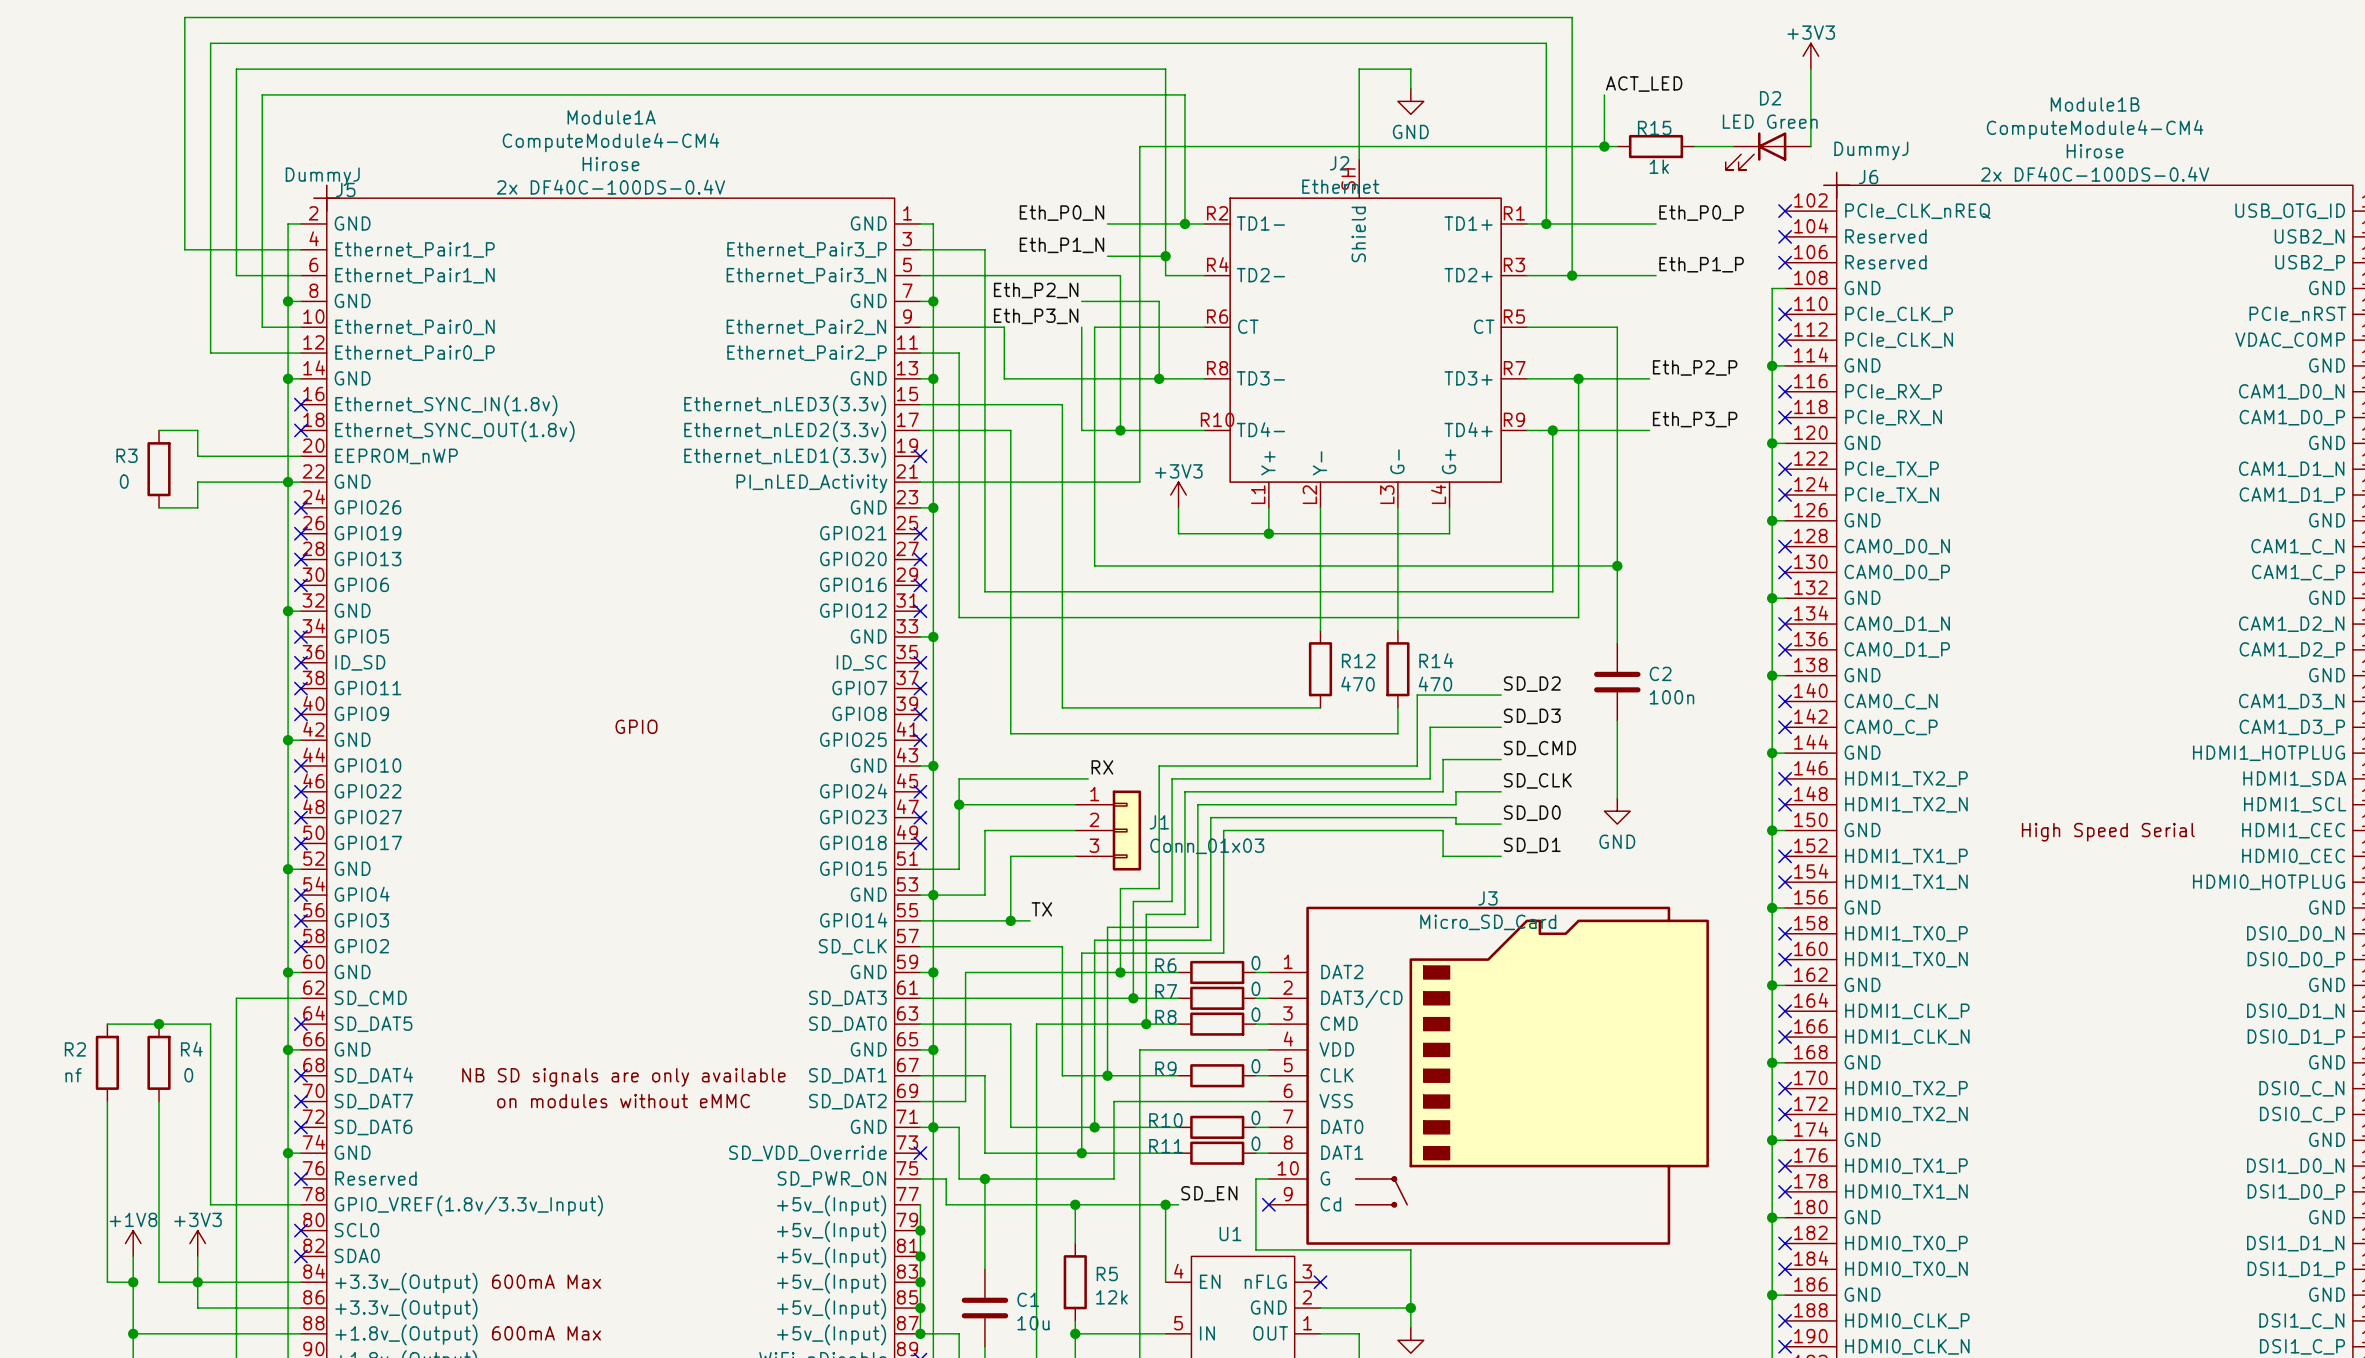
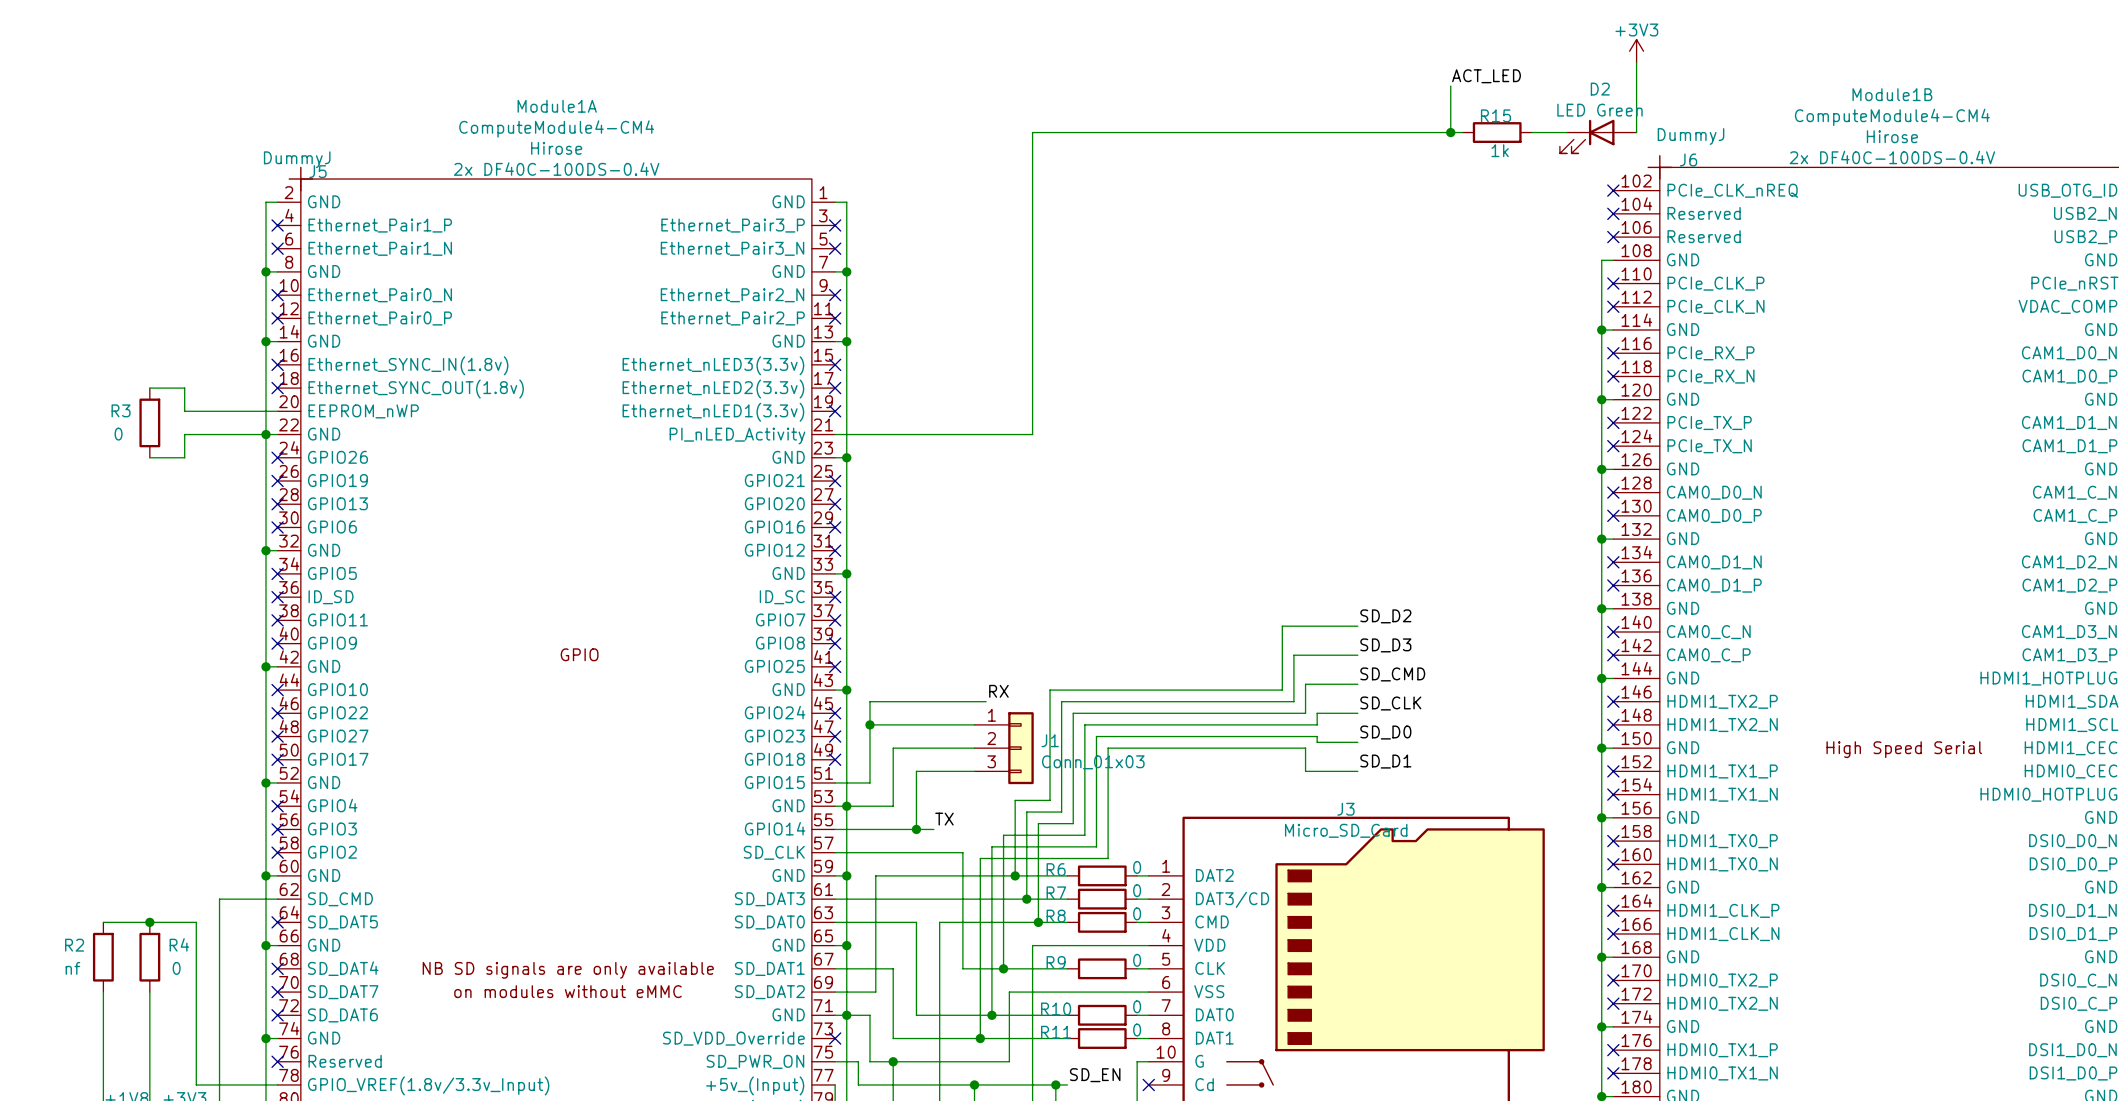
wire: (1410, 88) (1410, 69) (1359, 69) (1359, 159) -> none
power symbol: GND (1410, 101) -> none
label: Eth_P0_N (1061, 213) -> none
label: Eth_P0_P (1701, 213) -> none
wire: (1107, 223) (1204, 223) -> none
wire: (1184, 223) (1184, 94) (262, 94) (262, 327) (300, 327) -> none
junction: (1184, 223) -> none
wire: (1526, 223) (1656, 223) -> none
wire: (1546, 223) (1546, 43) (210, 43) (210, 353) (300, 353) -> none
junction: (1546, 223) -> none
label: Eth_P1_N (1061, 245) -> none
wire: (300, 249) (184, 249) (184, 17) (1572, 17) (1572, 275) -> none
no-connect mark: none -> (277, 225)
wire: (920, 249) (984, 249) (984, 591) (1552, 591) (1552, 430) -> none
no-connect mark: none -> (835, 225)
wire: (1107, 256) (1165, 256) -> none
junction: (1165, 256) -> none
label: Eth_P1_P (1701, 264) -> none
wire: (300, 275) (236, 275) (236, 69) (1165, 69) (1165, 275) (1204, 275) -> none
no-connect mark: none -> (277, 248)
wire: (920, 275) (1120, 275) (1120, 430) -> none
no-connect mark: none -> (835, 248)
wire: (1526, 275) (1656, 275) -> none
junction: (1572, 275) -> none
label: Eth_P2_N (1036, 290) -> none
wire: (1081, 301) (1159, 301) (1159, 378) -> none
label: Eth_P3_N (1036, 316) -> none
no-connect mark: none -> (277, 295)
wire: (920, 327) (1004, 327) (1004, 378) (1204, 378) -> none
no-connect mark: none -> (835, 295)
wire: (1081, 327) (1081, 430) (1204, 430) -> none
wire: (1204, 327) (1094, 327) (1094, 565) (1617, 565) -> none
wire: (1526, 327) (1617, 327) (1617, 643) -> none
J2: Ethernet (1365, 333) -> none
no-connect mark: none -> (277, 318)
wire: (920, 353) (959, 353) (959, 617) (1578, 617) (1578, 378) -> none
no-connect mark: none -> (835, 318)
label: Eth_P2_P (1695, 367) -> none
junction: (1159, 378) -> none
wire: (1526, 378) (1649, 378) -> none
junction: (1578, 378) -> none
wire: (920, 404) (1062, 404) (1062, 707) (1320, 707) -> none
no-connect mark: none -> (835, 364)
label: Eth_P3_P (1695, 419) -> none
wire: (920, 430) (1010, 430) (1010, 733) (1397, 733) (1397, 707) -> none
no-connect mark: none -> (835, 388)
junction: (1120, 430) -> none
wire: (1526, 430) (1649, 430) -> none
junction: (1552, 430) -> none
power symbol: +3V3 (1178, 495) -> none
wire: (1178, 507) (1178, 533) (1449, 533) (1449, 507) -> none
wire: (1268, 507) (1268, 533) -> none
wire: (1320, 507) (1320, 630) -> none
wire: (1397, 507) (1397, 630) -> none
junction: (1268, 533) -> none
junction: (1617, 565) -> none
R12: 470 (1320, 669) -> none
R14: 470 (1397, 669) -> none
C2: 100n (1617, 682) -> none
wire: (1617, 720) (1617, 798) -> none
power symbol: GND (1617, 811) -> none

